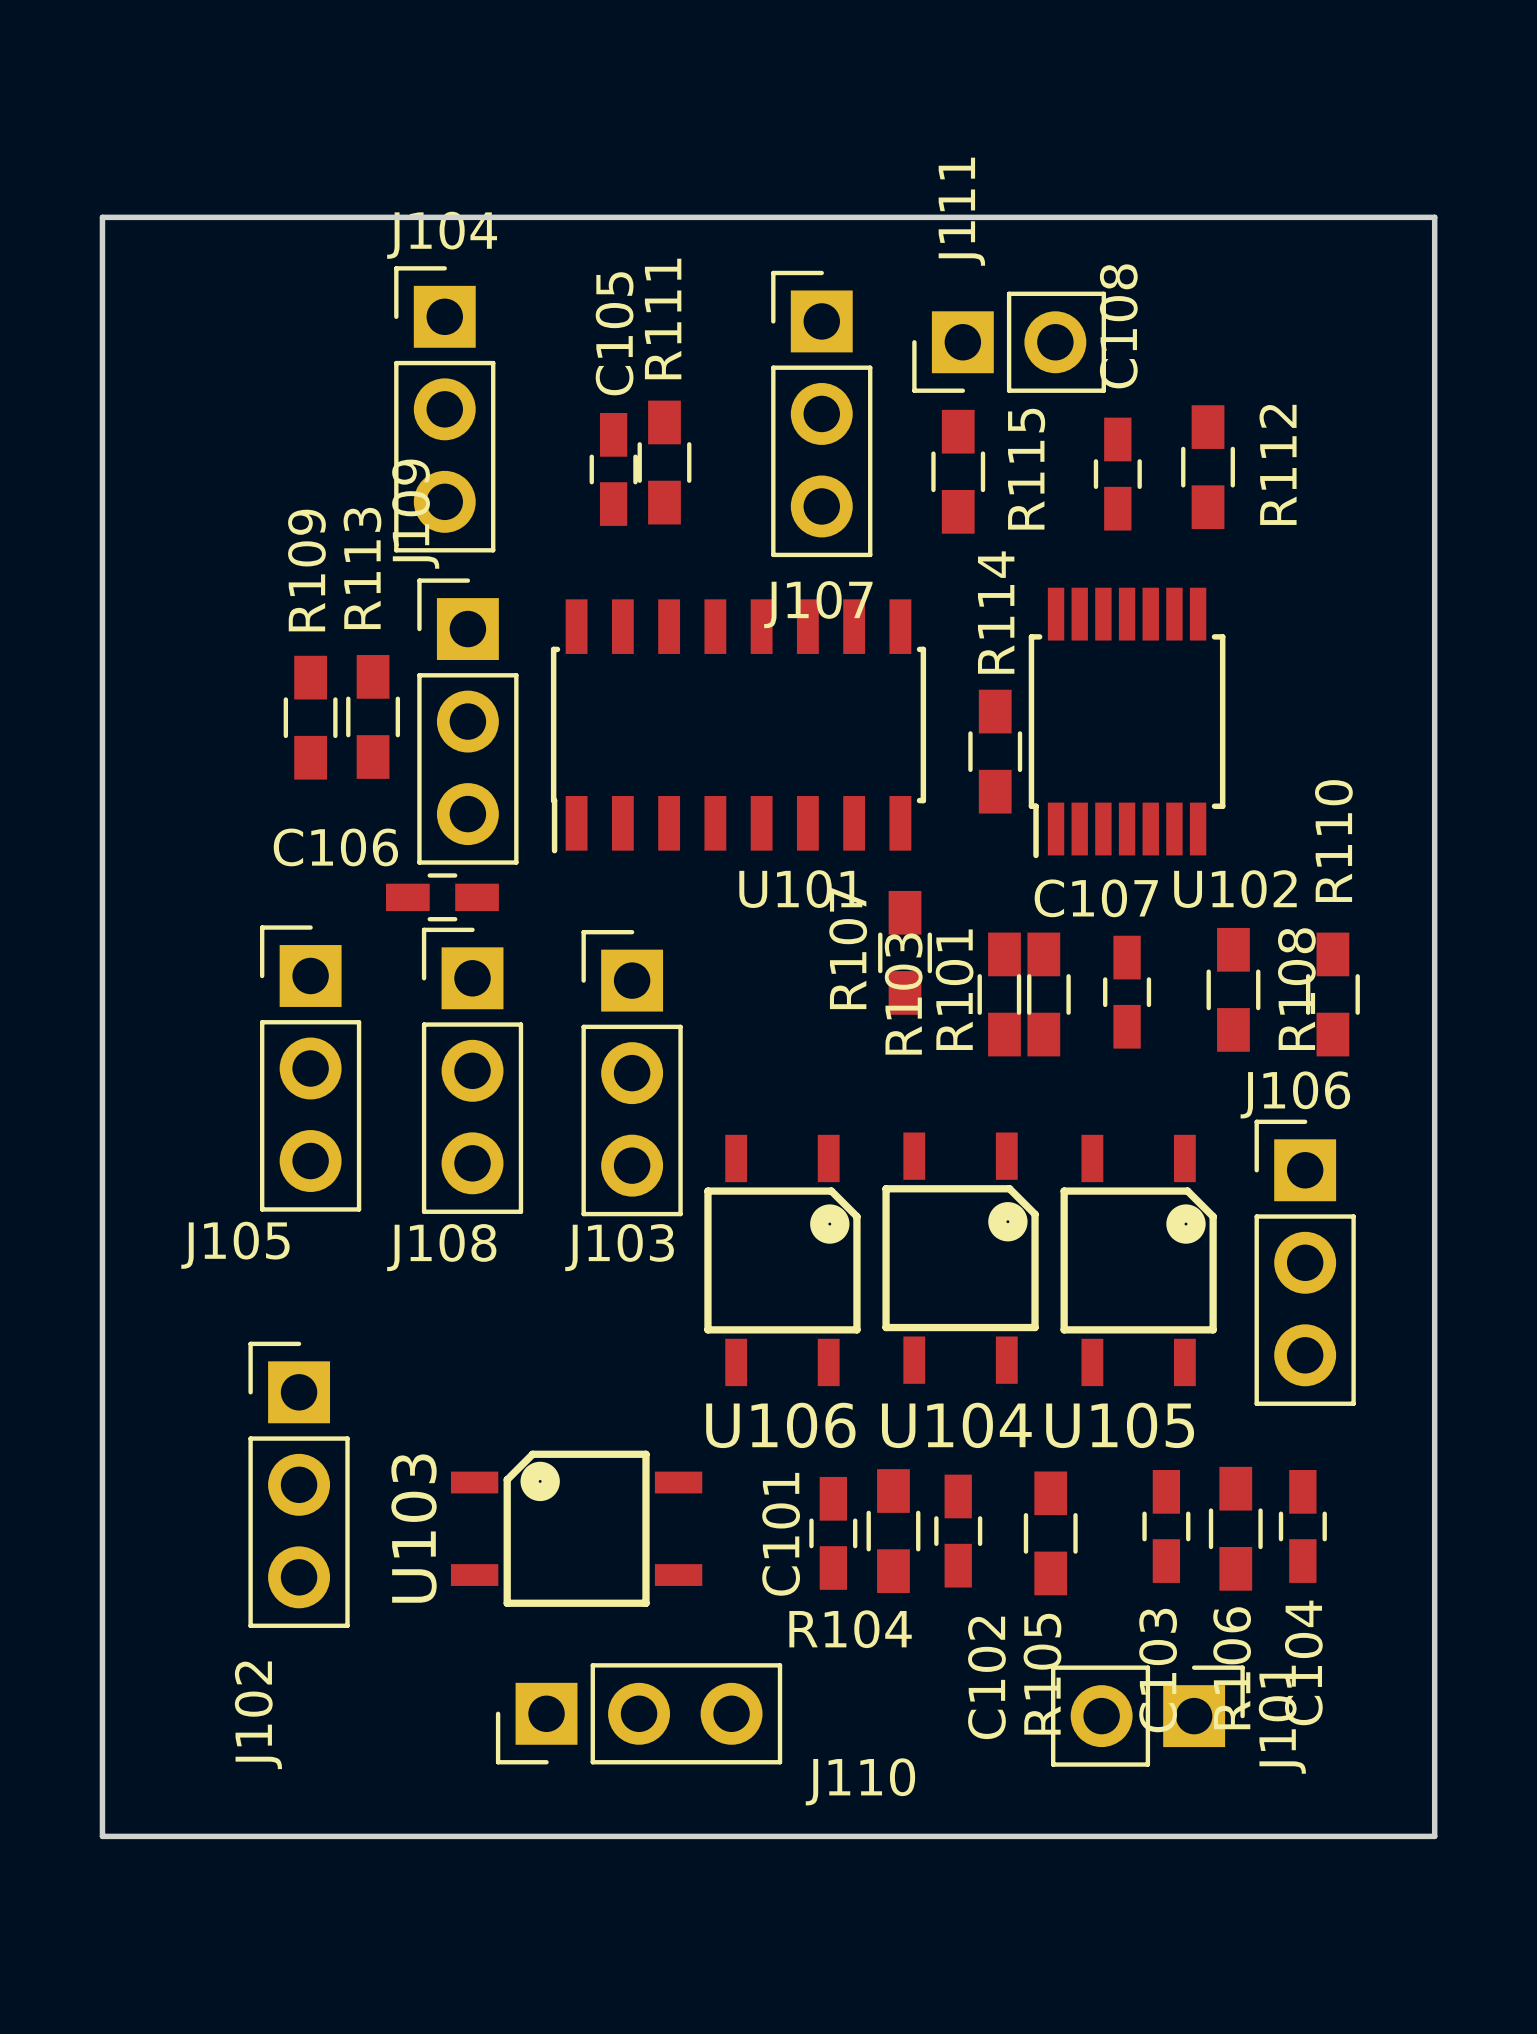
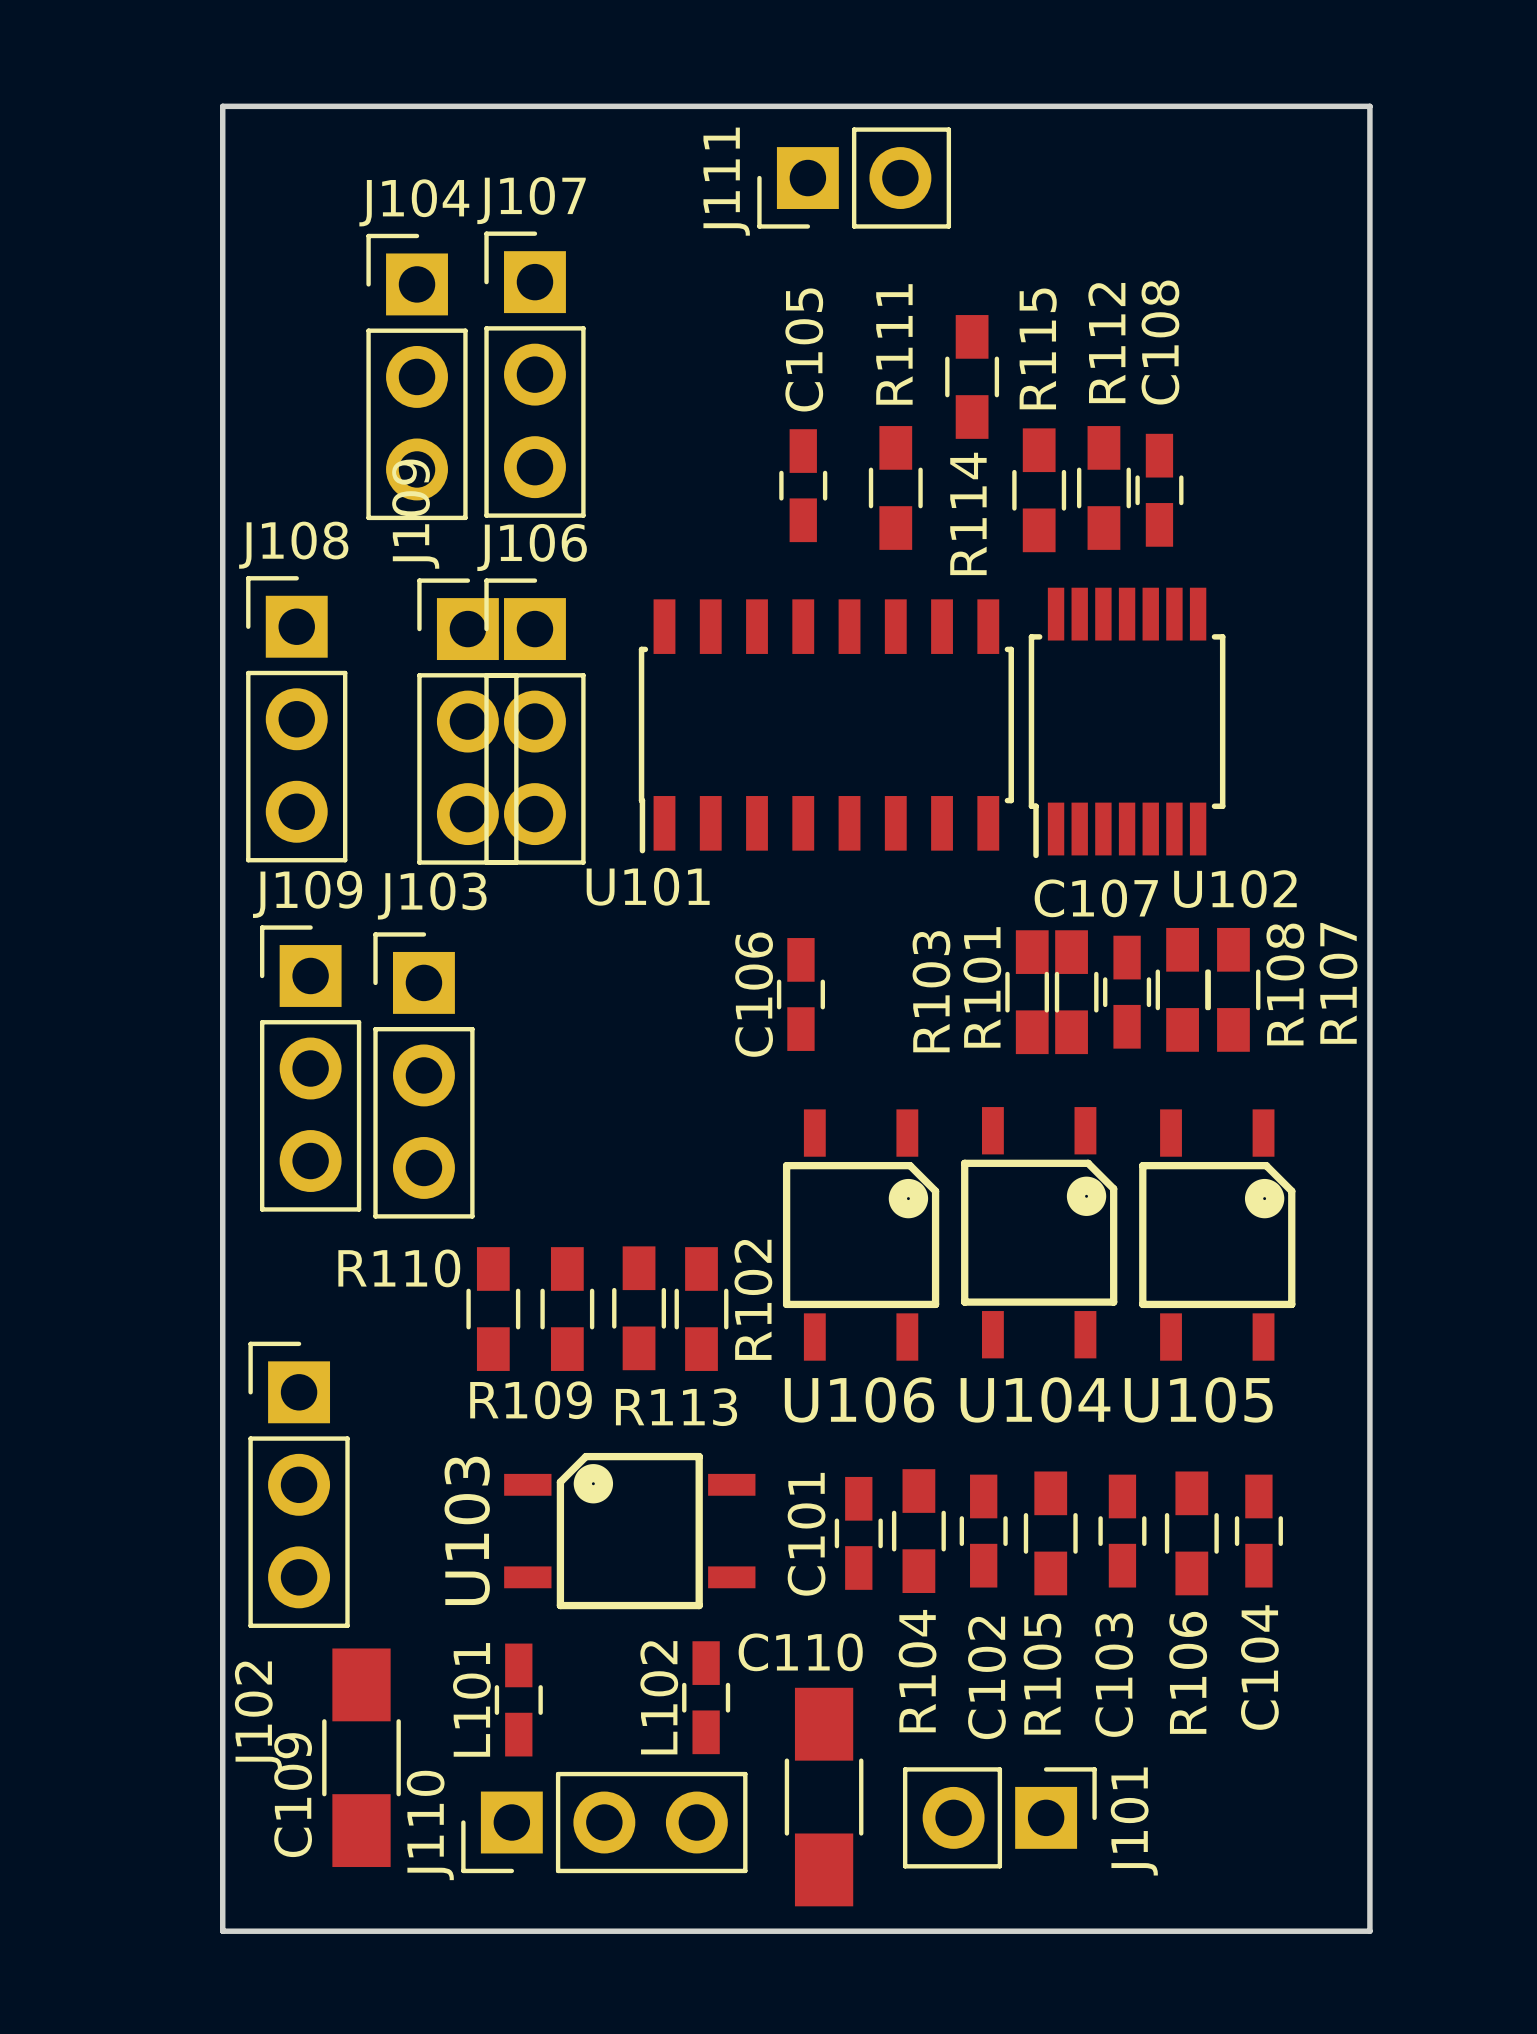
J111 name position: J111 (961, 211) -> J111 (726, 181)
board edge: (102, 217) (102, 1836) (1434, 1836) (1434, 217) (102, 217) -> (222, 106) (222, 1931) (1369, 1931) (1369, 106) (222, 106)
J111 position: (1009, 342) -> (854, 178)
J104 position: (444, 409) -> (417, 376)
J107 position: (821, 413) -> (534, 374)
R111 position: (664, 462) -> (895, 487)
R112 name position: R112 (1278, 464) -> R112 (1106, 343)
R112 position: (1208, 467) -> (1103, 487)
C105 position: (613, 469) -> (803, 485)
R115 name position: R115 (1026, 469) -> R115 (1038, 348)
R115 position: (958, 471) -> (1039, 490)
C108 position: (1117, 474) -> (1159, 490)
R113 name rotation: 0° (362, 568) -> 90° clockwise (676, 1407)
R113 name position: R113 (362, 568) -> R113 (676, 1407)
R109 name rotation: 0° (306, 570) -> 90° clockwise (531, 1400)
R109 name position: R109 (306, 570) -> R109 (531, 1400)
J107 name position: J107 (818, 604) -> J107 (531, 200)
R114 name position: R114 (996, 612) -> R114 (968, 513)
R113 position: (373, 716) -> (639, 1308)
R109 position: (310, 717) -> (567, 1309)
U101 position: (738, 726) -> (826, 726)
R114 position: (995, 751) -> (972, 376)
R110 name rotation: 0° (1333, 841) -> 90° clockwise (399, 1268)
C106 name position: C106 (335, 847) -> C106 (754, 994)
U101 name position: U101 (800, 889) -> U101 (648, 886)
C106 rotation: 0° (442, 897) -> 90° clockwise (800, 994)
C106 position: (442, 897) -> (800, 994)
R107: (905, 952) -> none
R108: none -> (1182, 989)
R108 name: R108 (1296, 989) -> R107 (1338, 983)
R103 position: (1004, 994) -> (1032, 992)
R101 position: (1043, 994) -> (1071, 992)
R110 position: (1332, 994) -> (493, 1309)
J108 position: (472, 1070) -> (296, 719)
J103 position: (632, 1073) -> (423, 1075)
J106 name position: J106 (1295, 1094) -> J106 (532, 547)
J105 name: J105 (235, 1245) -> J109 (307, 894)
J108 name position: J108 (441, 1247) -> J108 (293, 545)
J103 name position: J103 (619, 1247) -> J103 (432, 896)
U104 position: (960, 1258) -> (1039, 1232)
U106 position: (782, 1260) -> (861, 1235)
U105 position: (1138, 1260) -> (1217, 1235)
J106 position: (1305, 1262) -> (534, 721)
R102: none -> (701, 1309)
C103 position: (1166, 1526) -> (1122, 1531)
C104 position: (1302, 1526) -> (1258, 1531)
U103 position: (576, 1528) -> (629, 1531)
R106 position: (1235, 1528) -> (1191, 1533)
R104 position: (893, 1531) -> (918, 1531)
C102 position: (958, 1531) -> (983, 1531)
C101 position: (833, 1533) -> (858, 1533)
R104 name rotation: 0° (850, 1629) -> 90° counterclockwise (917, 1671)
L102: none -> (706, 1697)
L101: none -> (518, 1700)
J110 position: (639, 1713) -> (604, 1822)
J101 position: (1147, 1716) -> (999, 1817)
C109: none -> (361, 1757)
J110 name rotation: 0° (860, 1781) -> 90° counterclockwise (430, 1825)
J110 name position: J110 (860, 1781) -> J110 (430, 1825)
C110: none -> (824, 1797)

